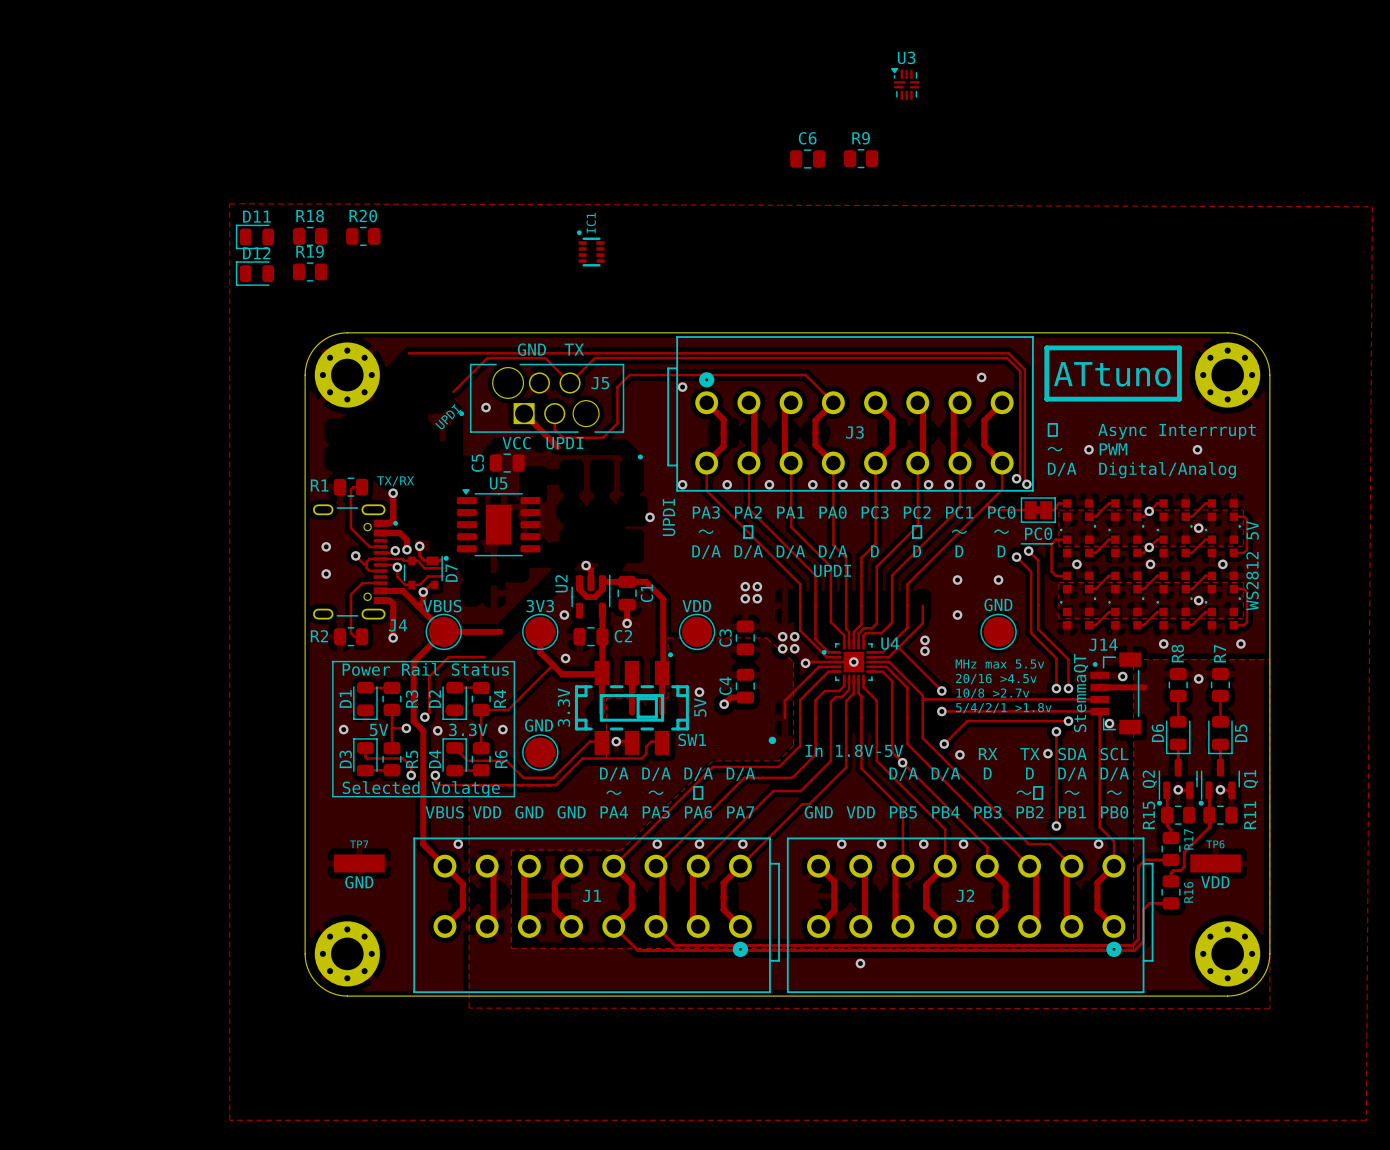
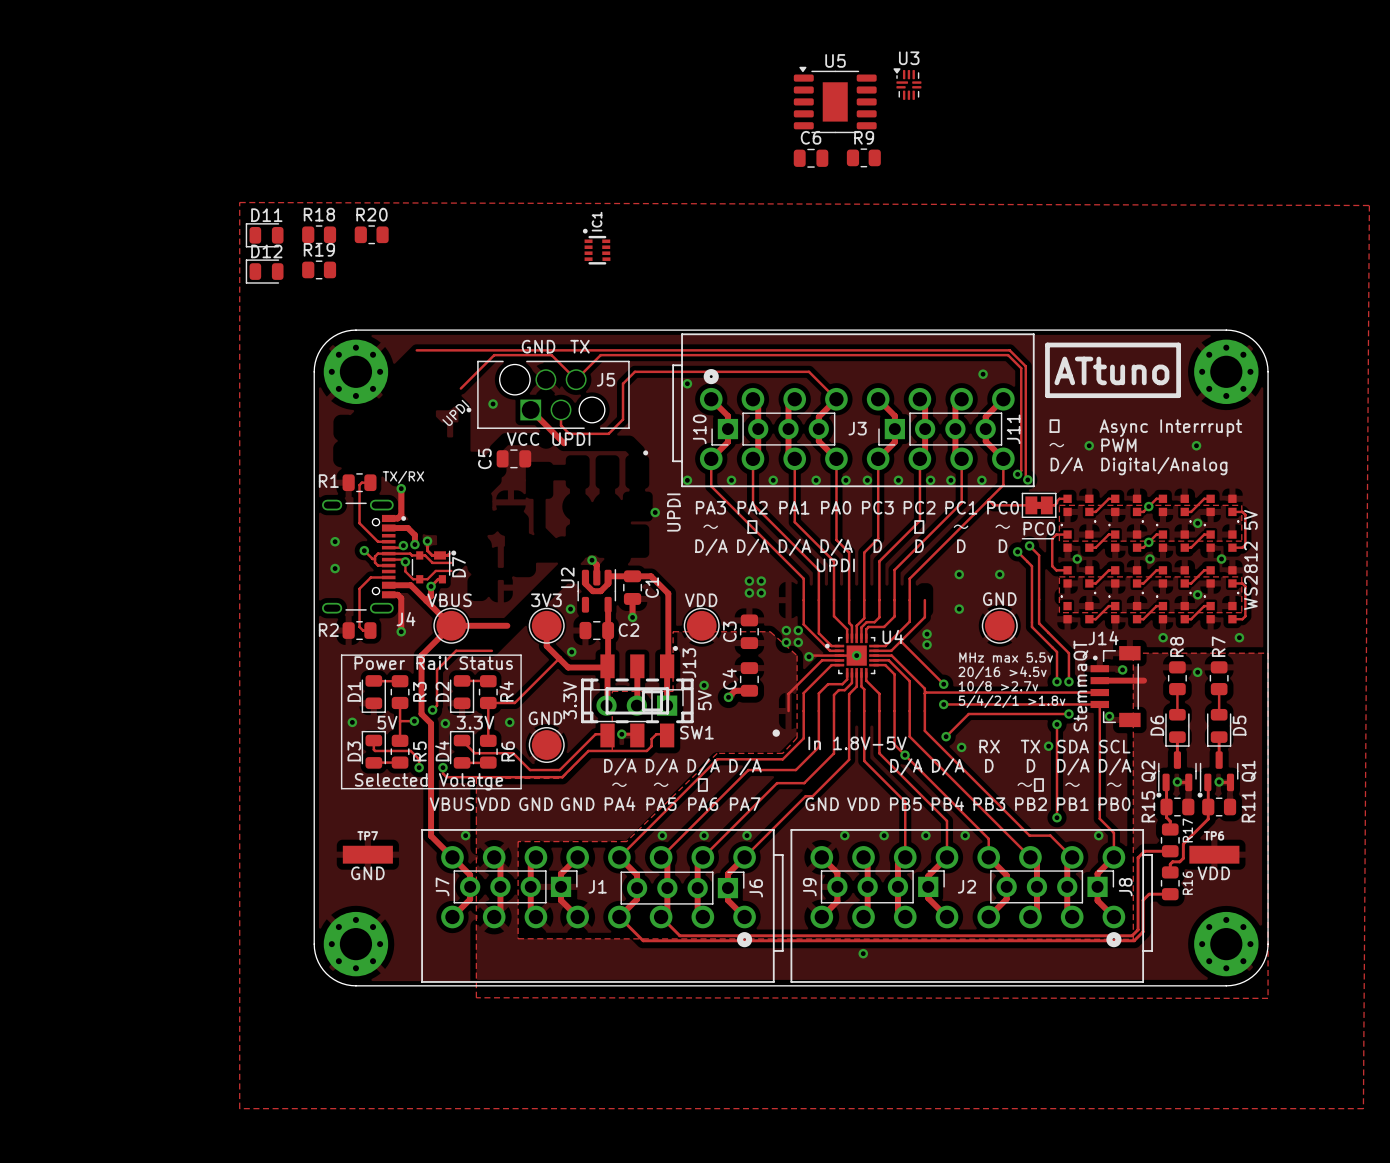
J10: none -> (773, 429)
J11: none -> (940, 429)
U5 position: (498, 522) -> (835, 99)
J13: none -> (636, 705)
J7: none -> (515, 886)
J9: none -> (882, 886)
J8: none -> (1052, 886)
J6: none -> (682, 888)

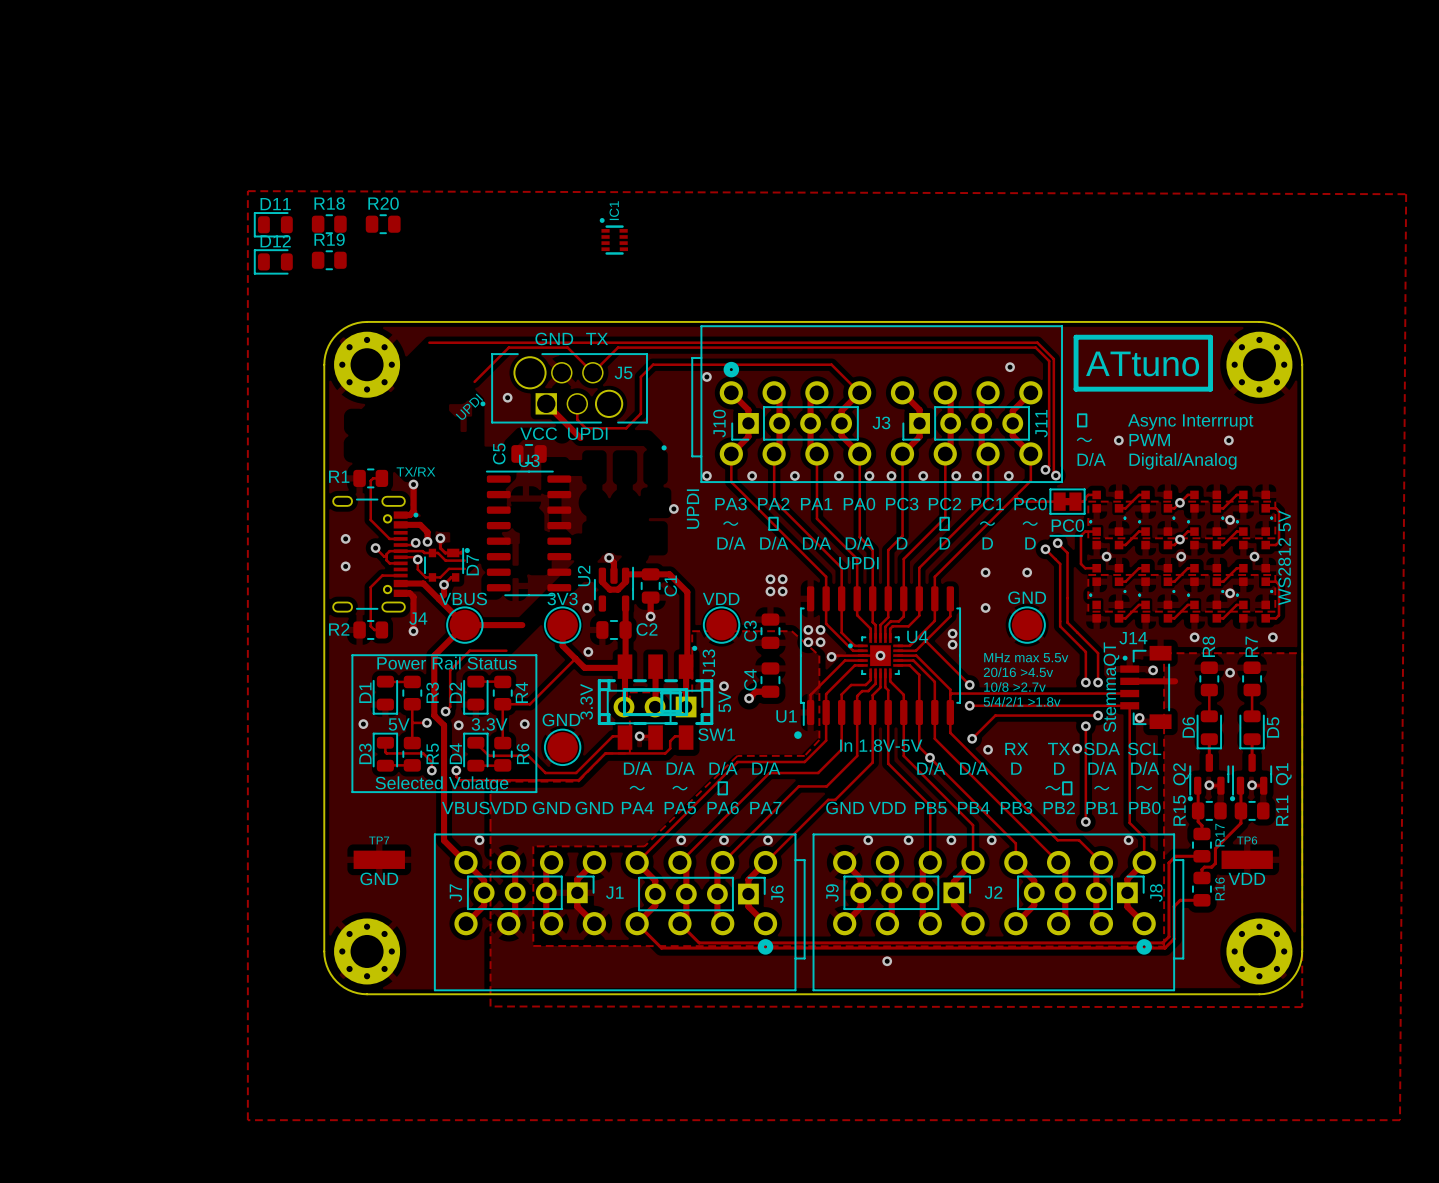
U3 name position: U3 (909, 58) -> U3 (529, 460)
U3 footprint: [893, 68, 922, 100] -> [486, 470, 572, 597]
U5: (835, 99) -> none
R9: (863, 157) -> none
C6: (811, 158) -> none
U1: none -> (880, 656)

